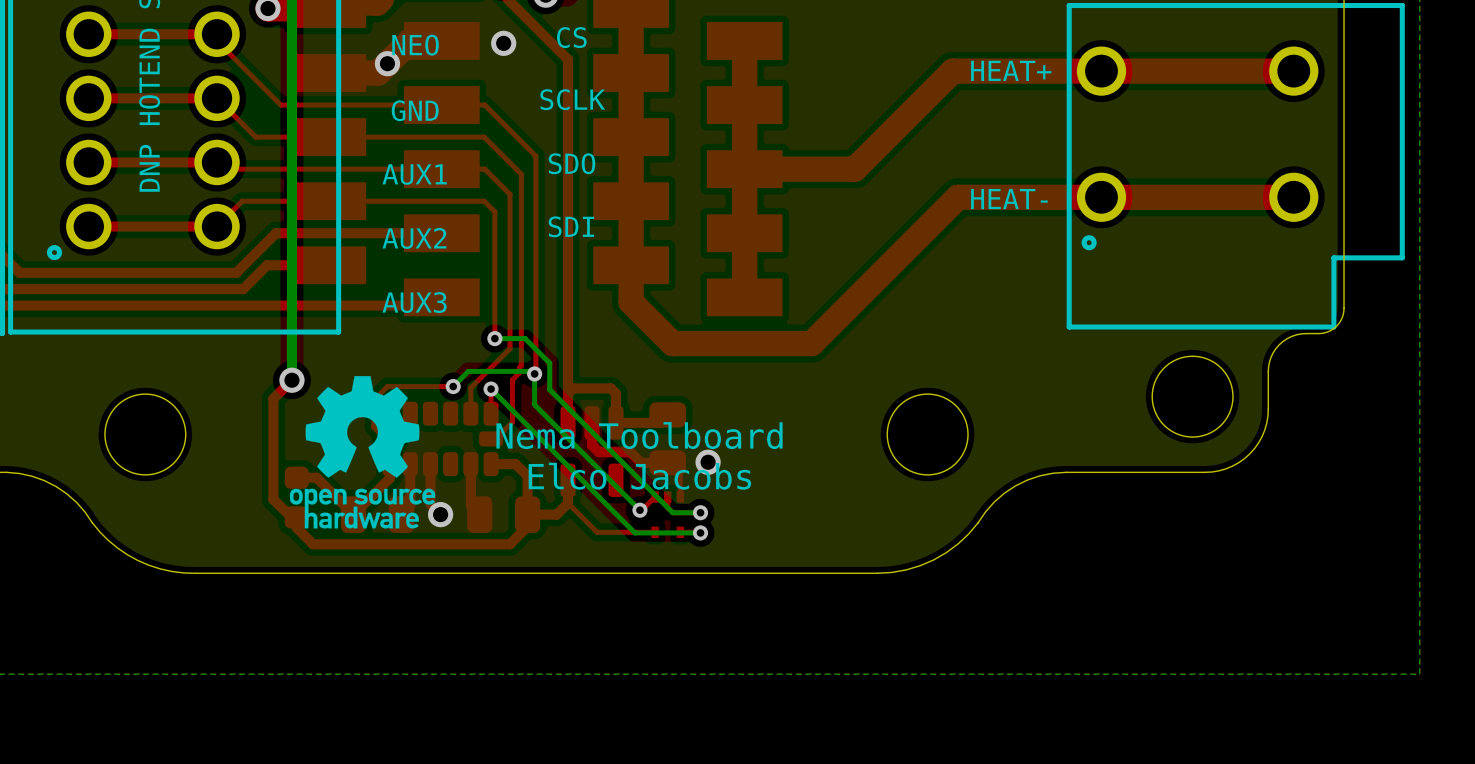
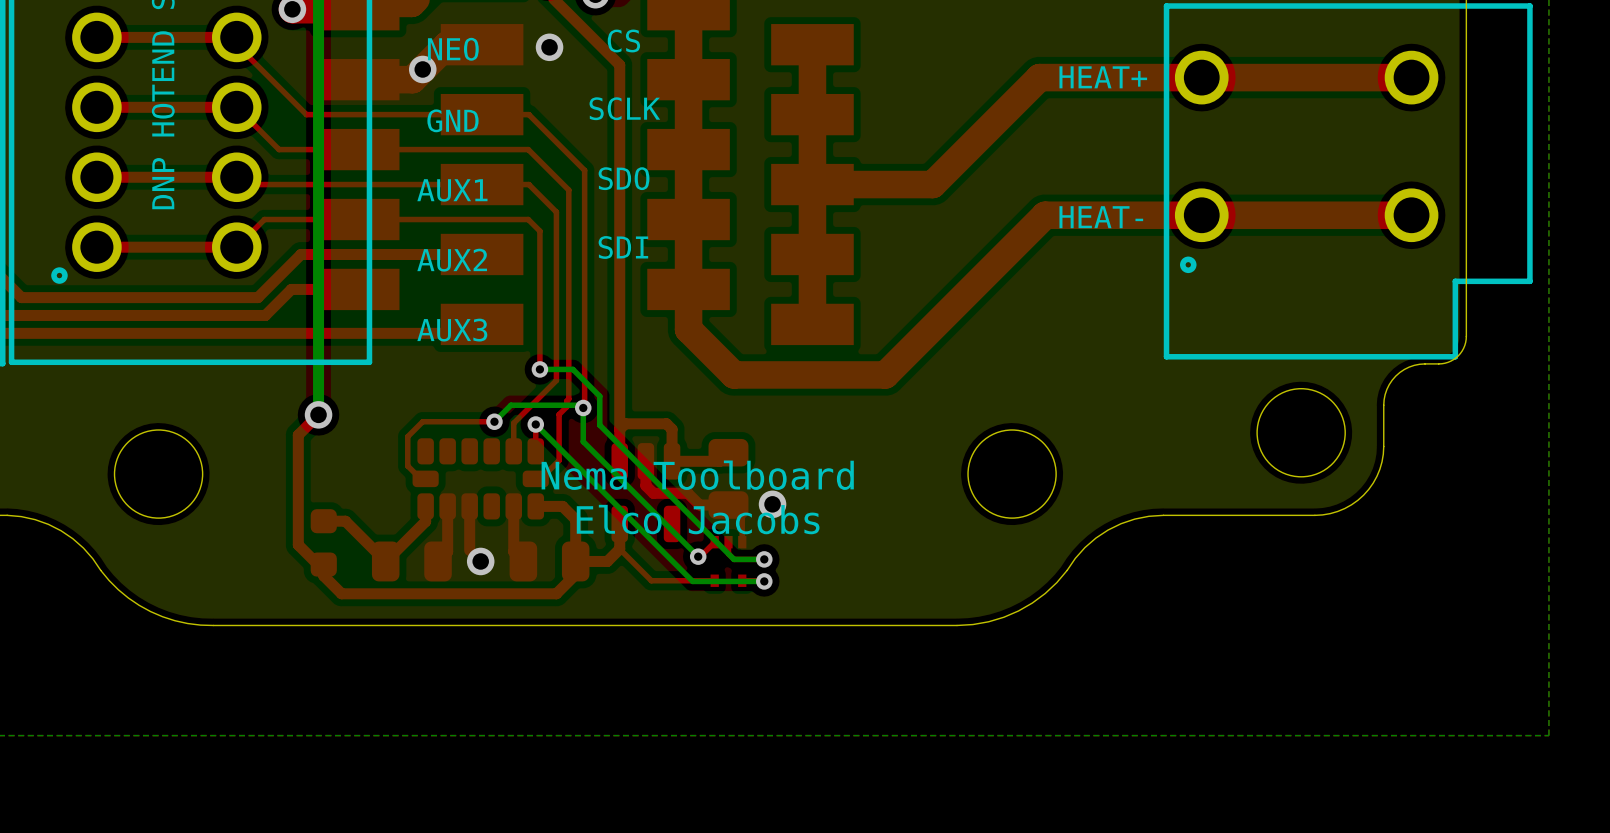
drawing: [289, 376, 436, 529] -> none

